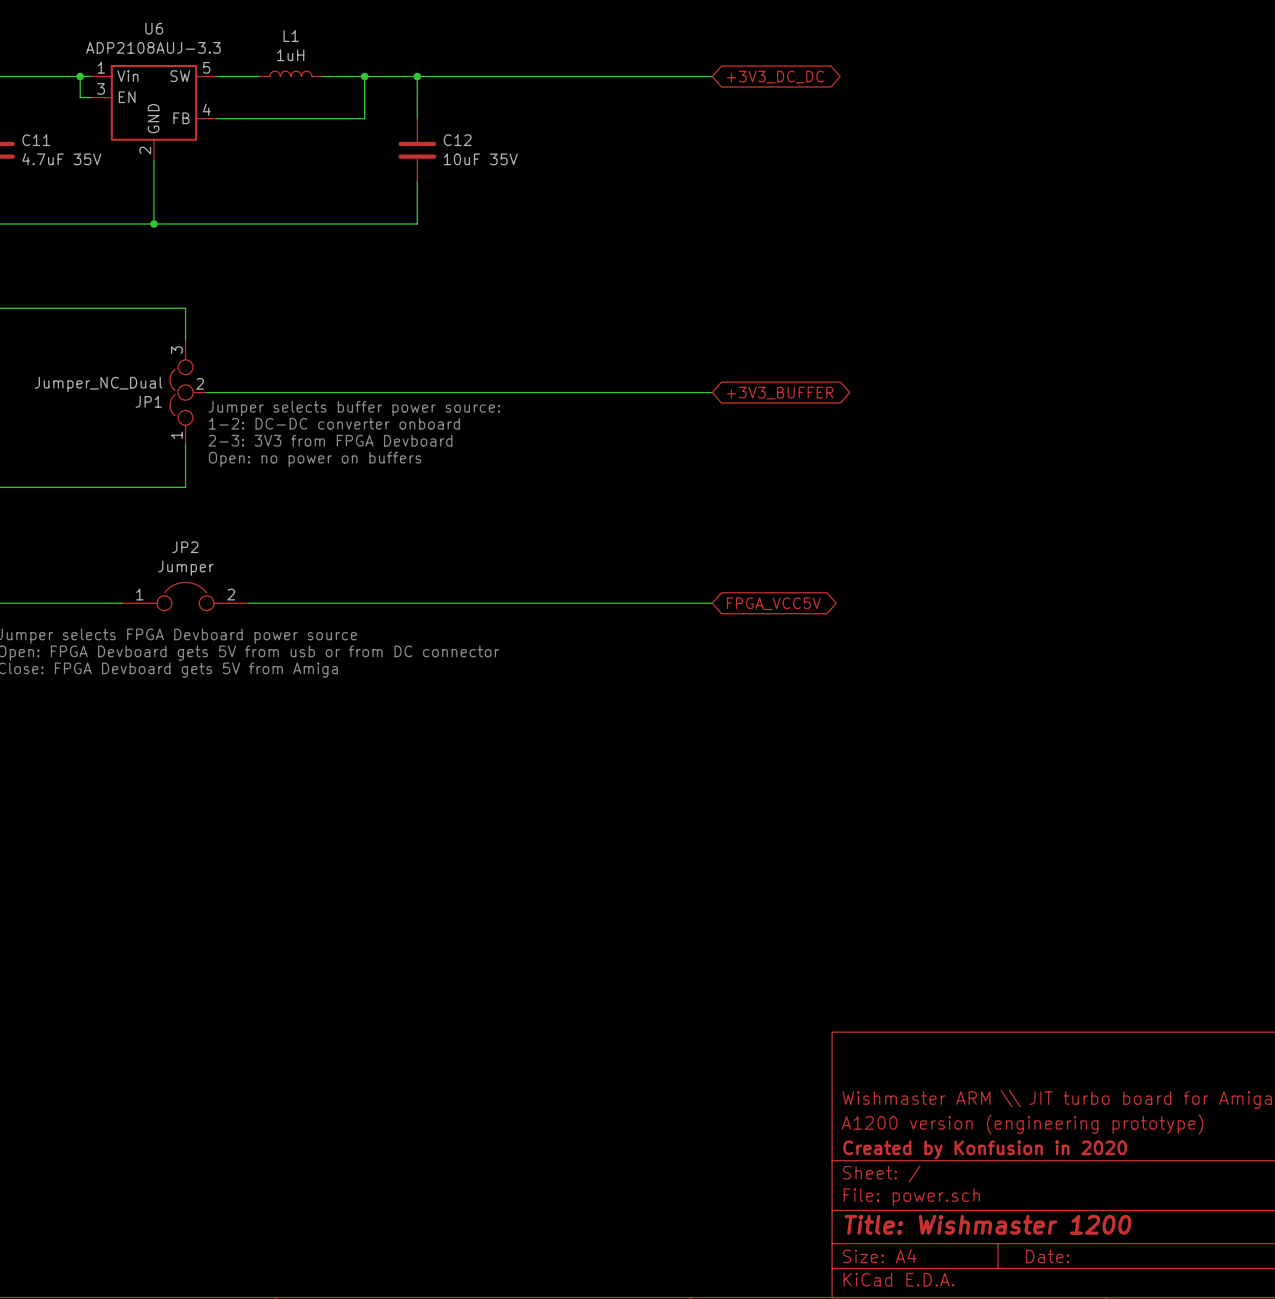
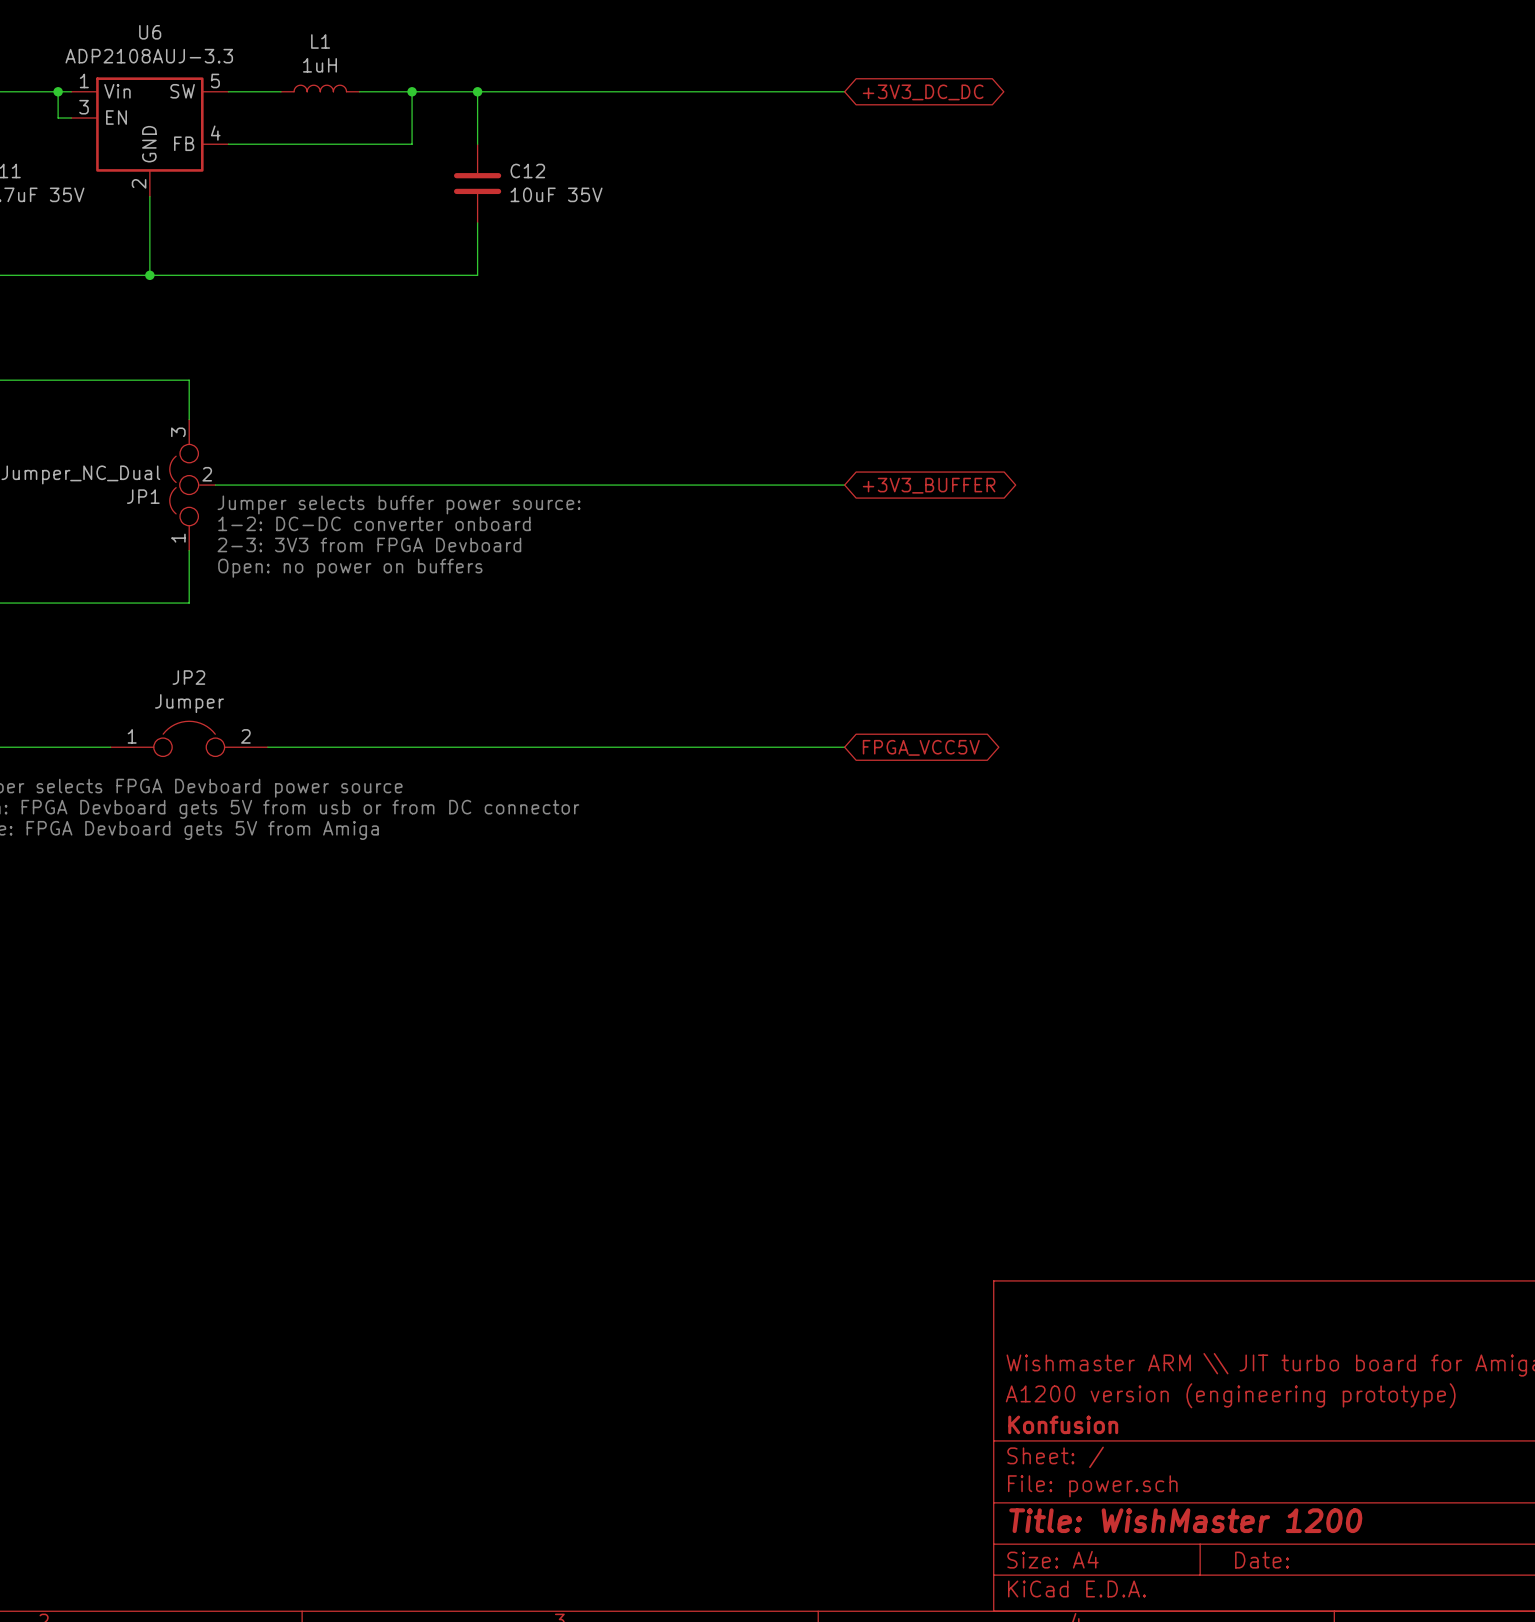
title block: Created by Konfusion in 2020 (985, 1149) -> Konfusion (1063, 1424)
title block: Title: Wishmaster 1200 (988, 1224) -> Title: WishMaster 1200 (1185, 1520)

